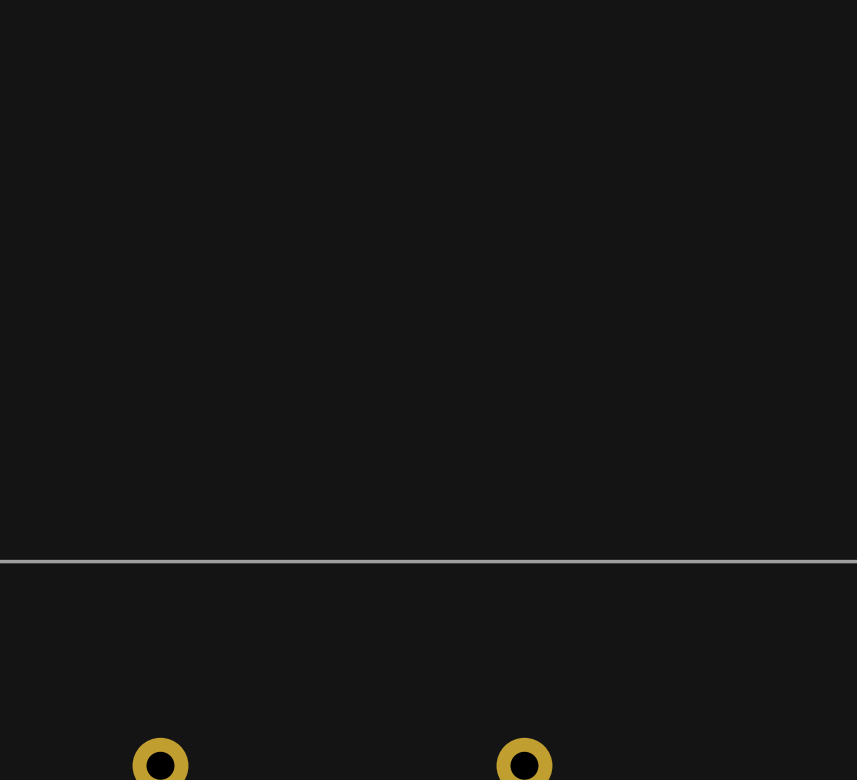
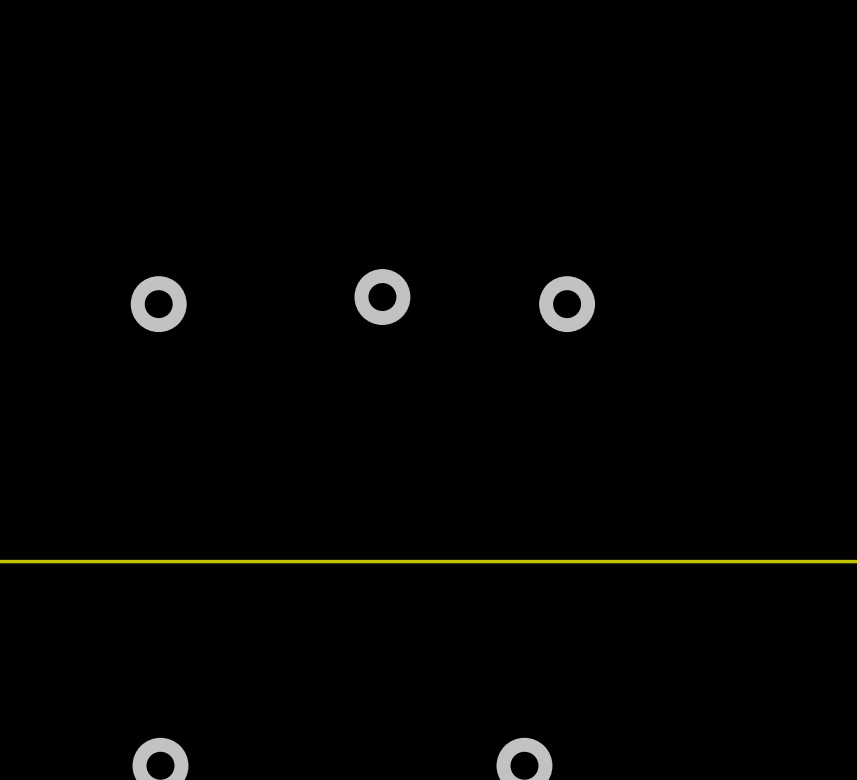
via: none -> (382, 297)
via: none -> (158, 304)
via: none -> (567, 304)

